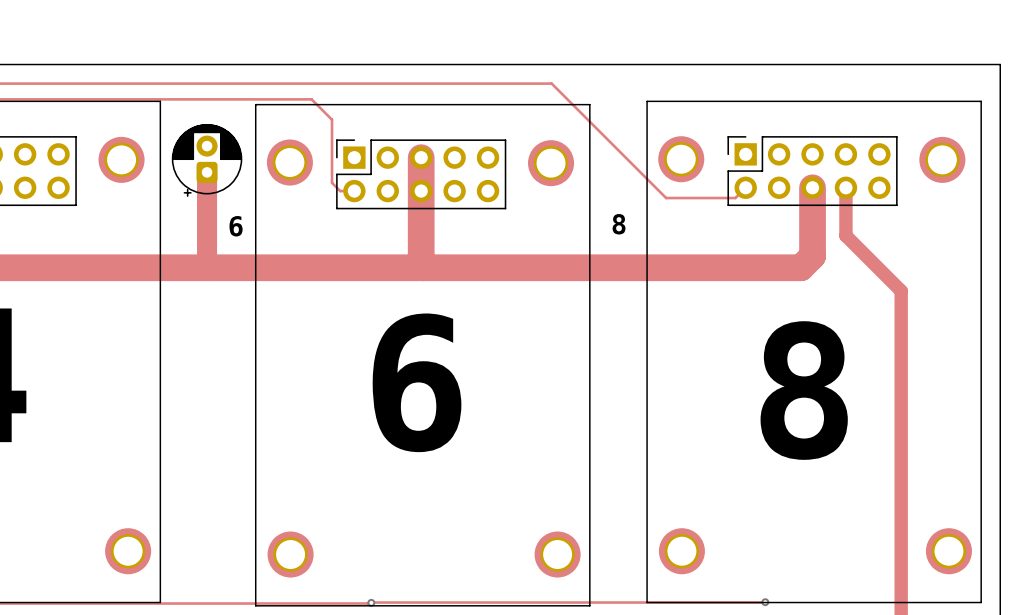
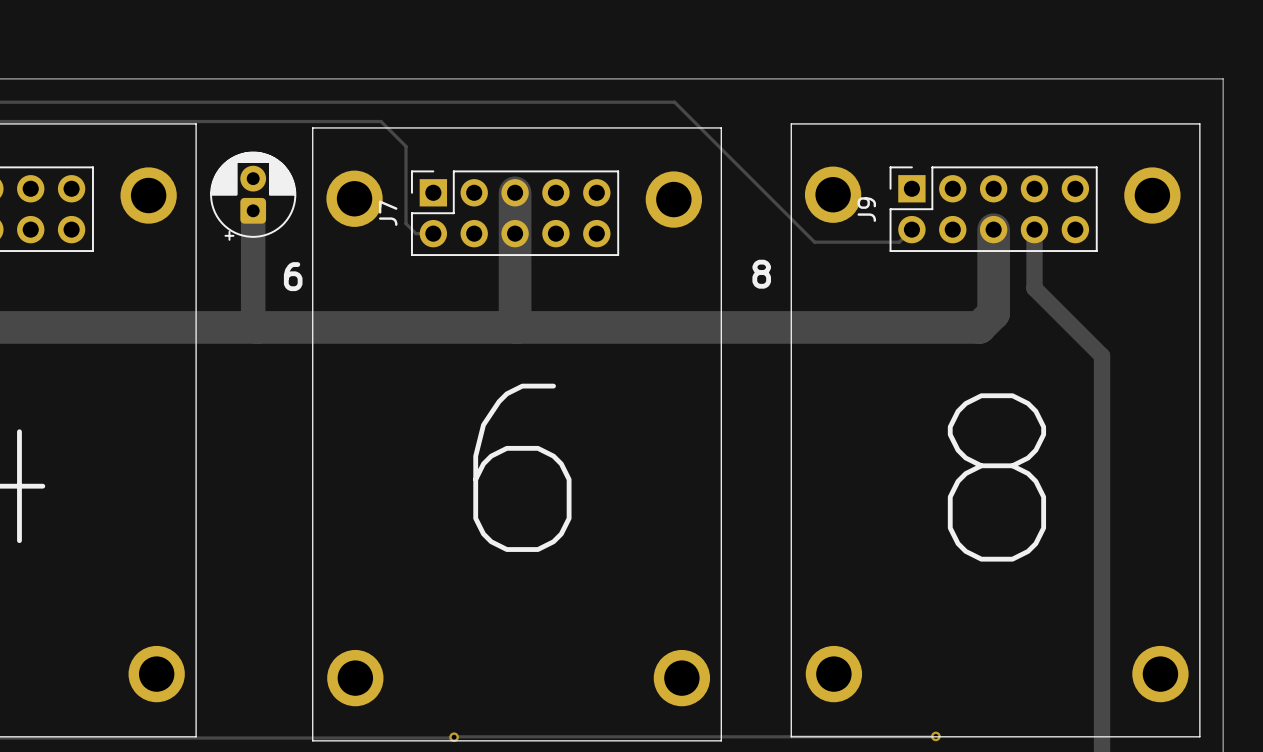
J9 name: none -> J9 (866, 209)
J7 name: none -> J7 (388, 213)

